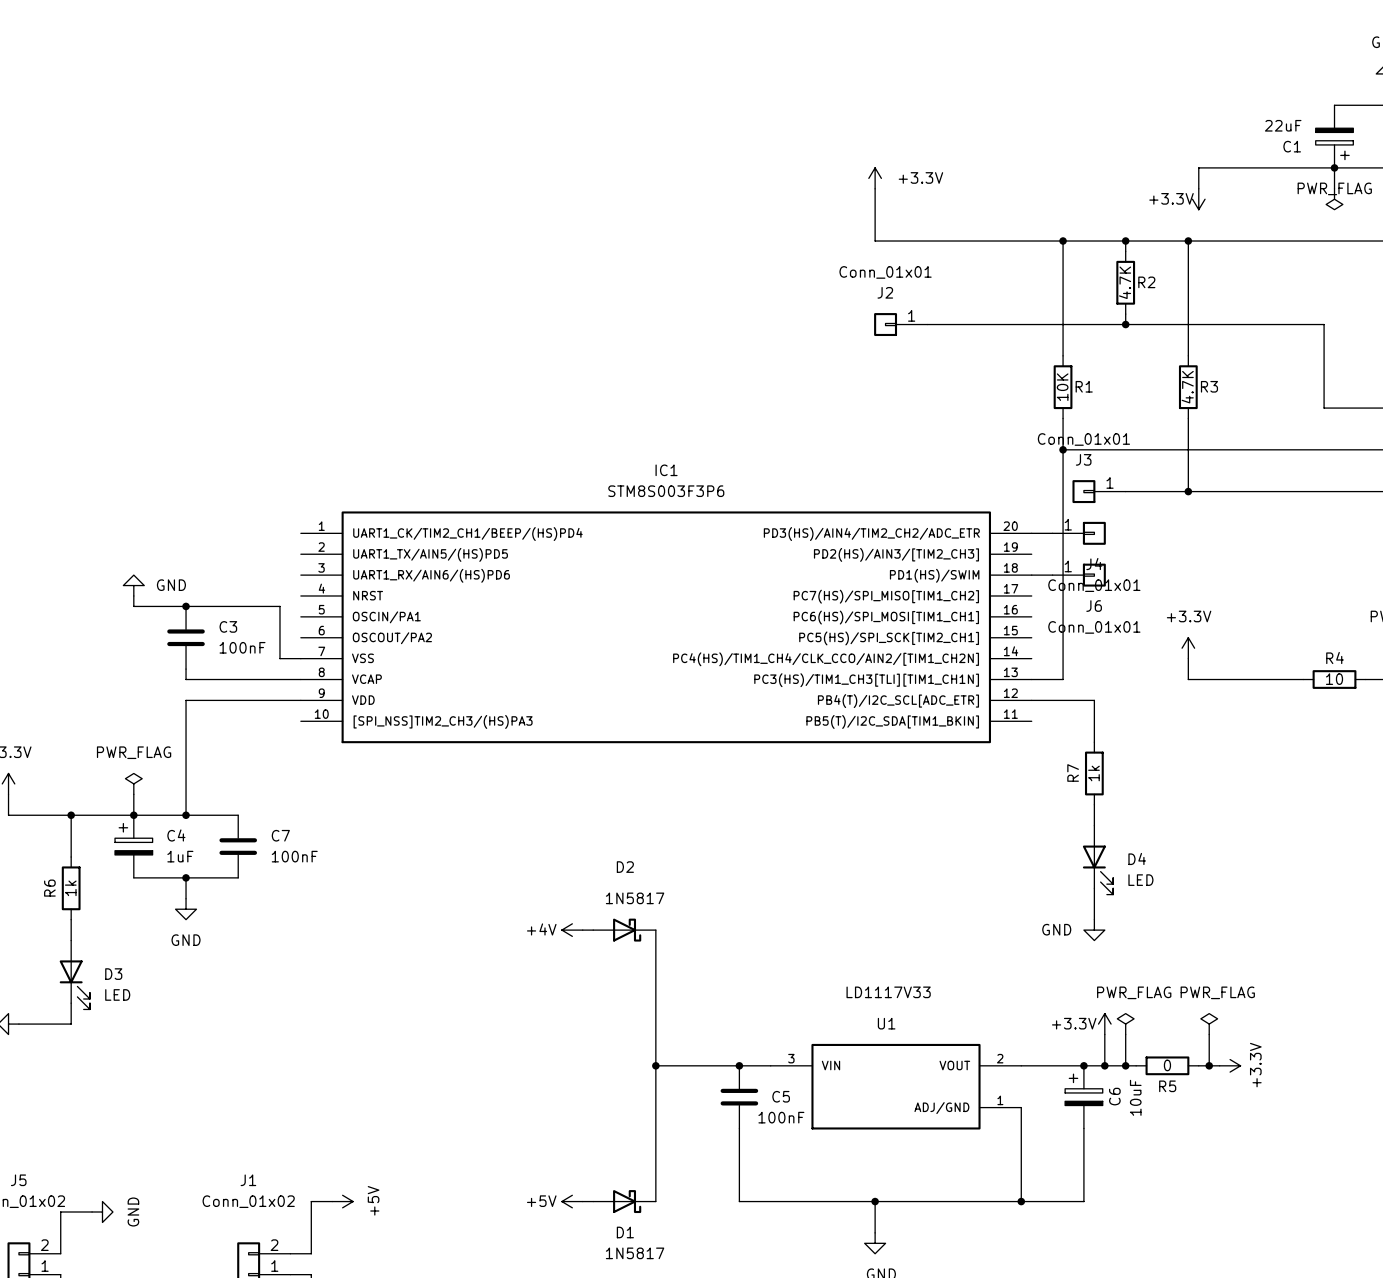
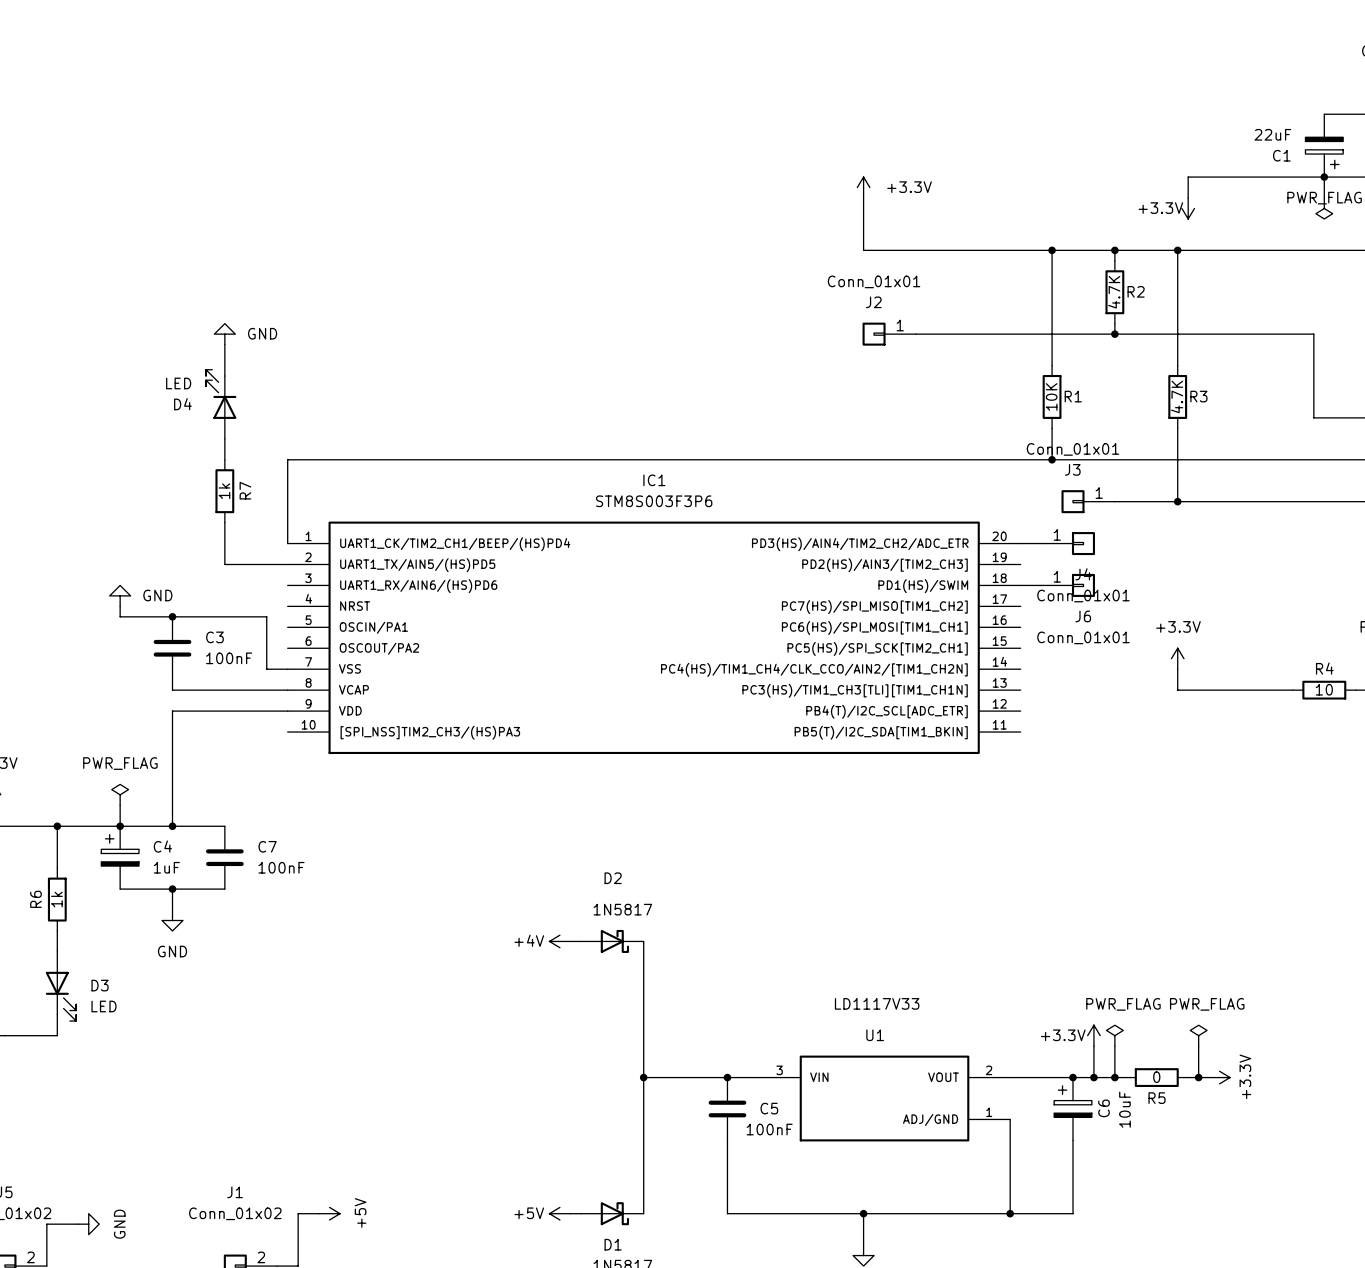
power symbol: none -> GND (224, 334)
wire: none -> (224, 344) (224, 376)
wire: none -> (224, 438) (224, 459)
wire: (1063, 449) (1063, 679) (1031, 679) -> (1052, 459) (287, 459) (287, 543)
wire: none -> (224, 522) (224, 564) (287, 564)
wire: (1031, 700) (1094, 700) (1094, 742) -> none
R7 name position: R7 (1073, 772) -> R7 (245, 490)
R7 position: (1094, 773) -> (224, 491)
wire: (1094, 804) (1094, 825) -> none
D4 position: (1098, 860) -> (221, 404)
D4 rotation: 0° (1098, 870) -> 180° (221, 394)
wire: (1094, 888) (1094, 919) -> none
power symbol: GND (1094, 930) -> none

